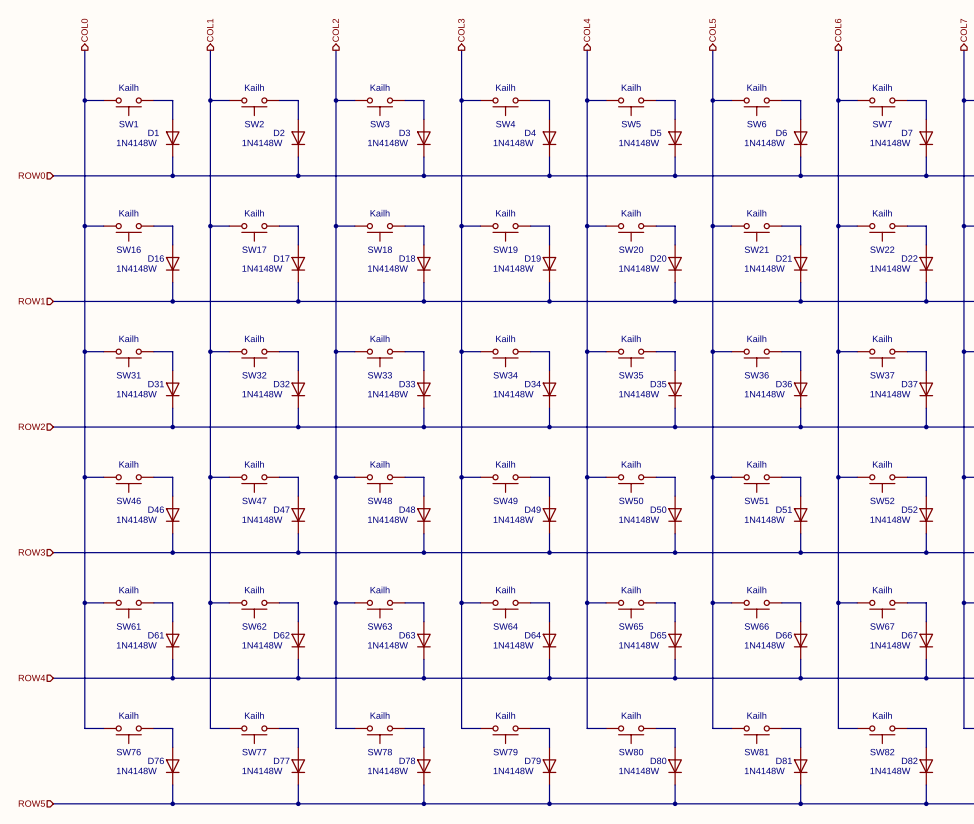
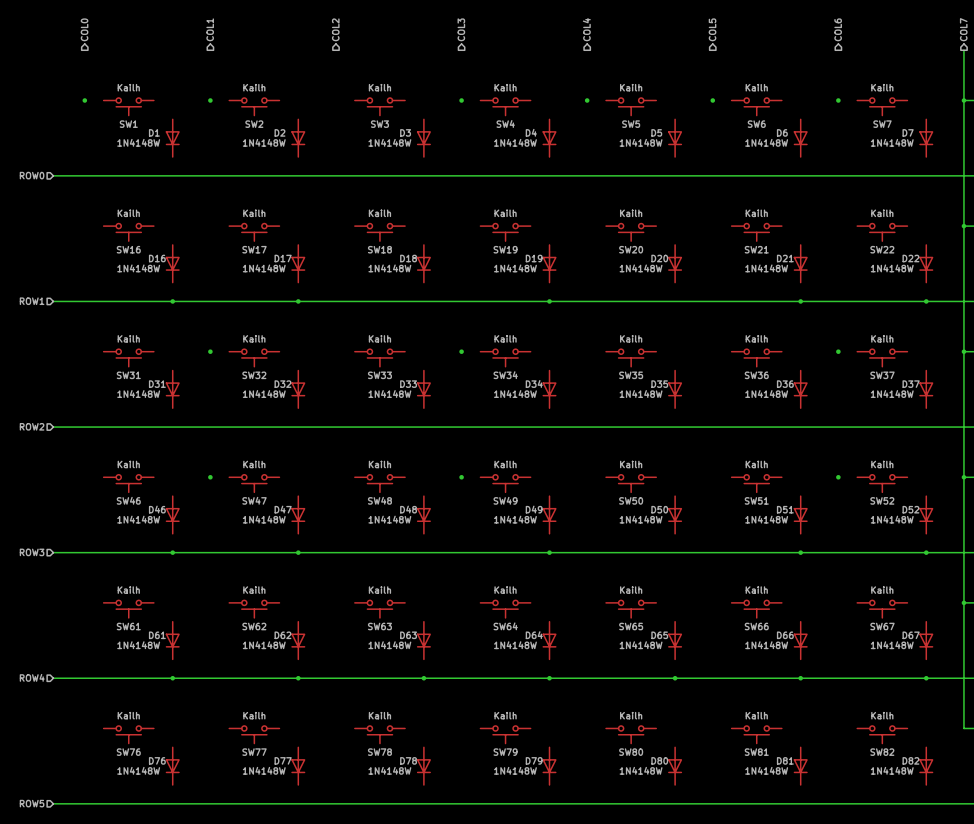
wire: (84, 50) (84, 728) (103, 728) -> none
wire: (210, 50) (210, 728) (229, 728) -> none
wire: (335, 50) (335, 728) (354, 728) -> none
wire: (461, 50) (461, 728) (480, 728) -> none
wire: (587, 50) (587, 728) (606, 728) -> none
wire: (712, 50) (712, 728) (731, 728) -> none
wire: (838, 50) (838, 728) (857, 728) -> none
wire: (84, 100) (103, 100) -> none
wire: (153, 100) (172, 100) (172, 119) -> none
wire: (210, 100) (229, 100) -> none
wire: (279, 100) (298, 100) (298, 119) -> none
wire: (335, 100) (354, 100) -> none
junction: (335, 100) -> none
wire: (405, 100) (423, 100) (423, 119) -> none
wire: (461, 100) (480, 100) -> none
wire: (530, 100) (549, 100) (549, 119) -> none
wire: (587, 100) (606, 100) -> none
wire: (656, 100) (675, 100) (675, 119) -> none
wire: (712, 100) (731, 100) -> none
wire: (781, 100) (800, 100) (800, 119) -> none
wire: (838, 100) (857, 100) -> none
wire: (907, 100) (926, 100) (926, 119) -> none
wire: (172, 157) (172, 175) -> none
wire: (298, 157) (298, 175) -> none
wire: (423, 157) (423, 175) -> none
wire: (549, 157) (549, 175) -> none
wire: (675, 157) (675, 175) -> none
wire: (800, 157) (800, 175) -> none
wire: (926, 157) (926, 175) -> none
junction: (172, 175) -> none
junction: (298, 175) -> none
junction: (423, 175) -> none
junction: (549, 175) -> none
junction: (675, 175) -> none
junction: (800, 175) -> none
junction: (926, 175) -> none
wire: (84, 226) (103, 226) -> none
junction: (84, 226) -> none
wire: (153, 226) (172, 226) (172, 244) -> none
wire: (210, 226) (229, 226) -> none
junction: (210, 226) -> none
wire: (279, 226) (298, 226) (298, 244) -> none
wire: (335, 226) (354, 226) -> none
junction: (335, 226) -> none
wire: (405, 226) (423, 226) (423, 244) -> none
wire: (461, 226) (480, 226) -> none
junction: (461, 226) -> none
wire: (530, 226) (549, 226) (549, 244) -> none
wire: (587, 226) (606, 226) -> none
junction: (587, 226) -> none
wire: (656, 226) (675, 226) (675, 244) -> none
wire: (712, 226) (731, 226) -> none
junction: (712, 226) -> none
wire: (781, 226) (800, 226) (800, 244) -> none
wire: (838, 226) (857, 226) -> none
junction: (838, 226) -> none
wire: (907, 226) (926, 226) (926, 244) -> none
wire: (172, 282) (172, 301) -> none
wire: (298, 282) (298, 301) -> none
wire: (423, 282) (423, 301) -> none
wire: (549, 282) (549, 301) -> none
wire: (675, 282) (675, 301) -> none
wire: (800, 282) (800, 301) -> none
wire: (926, 282) (926, 301) -> none
junction: (423, 301) -> none
junction: (675, 301) -> none
wire: (84, 351) (103, 351) -> none
junction: (84, 351) -> none
wire: (153, 351) (172, 351) (172, 370) -> none
wire: (210, 351) (229, 351) -> none
wire: (279, 351) (298, 351) (298, 370) -> none
wire: (335, 351) (354, 351) -> none
junction: (335, 351) -> none
wire: (405, 351) (423, 351) (423, 370) -> none
wire: (461, 351) (480, 351) -> none
wire: (530, 351) (549, 351) (549, 370) -> none
wire: (587, 351) (606, 351) -> none
junction: (587, 351) -> none
wire: (656, 351) (675, 351) (675, 370) -> none
wire: (712, 351) (731, 351) -> none
junction: (712, 351) -> none
wire: (781, 351) (800, 351) (800, 370) -> none
wire: (838, 351) (857, 351) -> none
wire: (907, 351) (926, 351) (926, 370) -> none
wire: (172, 408) (172, 427) -> none
wire: (298, 408) (298, 427) -> none
wire: (423, 408) (423, 427) -> none
wire: (549, 408) (549, 427) -> none
wire: (675, 408) (675, 427) -> none
wire: (800, 408) (800, 427) -> none
wire: (926, 408) (926, 427) -> none
junction: (172, 427) -> none
junction: (298, 427) -> none
junction: (423, 427) -> none
junction: (549, 427) -> none
junction: (675, 427) -> none
junction: (800, 427) -> none
junction: (926, 427) -> none
wire: (84, 477) (103, 477) -> none
junction: (84, 477) -> none
wire: (153, 477) (172, 477) (172, 496) -> none
wire: (210, 477) (229, 477) -> none
wire: (279, 477) (298, 477) (298, 496) -> none
wire: (335, 477) (354, 477) -> none
junction: (335, 477) -> none
wire: (405, 477) (423, 477) (423, 496) -> none
wire: (461, 477) (480, 477) -> none
wire: (530, 477) (549, 477) (549, 496) -> none
wire: (587, 477) (606, 477) -> none
junction: (587, 477) -> none
wire: (656, 477) (675, 477) (675, 496) -> none
wire: (712, 477) (731, 477) -> none
junction: (712, 477) -> none
wire: (781, 477) (800, 477) (800, 496) -> none
wire: (838, 477) (857, 477) -> none
wire: (907, 477) (926, 477) (926, 496) -> none
wire: (172, 533) (172, 552) -> none
wire: (298, 533) (298, 552) -> none
wire: (423, 533) (423, 552) -> none
wire: (549, 533) (549, 552) -> none
wire: (675, 533) (675, 552) -> none
wire: (800, 533) (800, 552) -> none
wire: (926, 533) (926, 552) -> none
junction: (423, 552) -> none
junction: (675, 552) -> none
wire: (84, 602) (103, 602) -> none
junction: (84, 602) -> none
wire: (153, 602) (172, 602) (172, 621) -> none
wire: (210, 602) (229, 602) -> none
junction: (210, 602) -> none
wire: (279, 602) (298, 602) (298, 621) -> none
wire: (335, 602) (354, 602) -> none
junction: (335, 602) -> none
wire: (405, 602) (423, 602) (423, 621) -> none
wire: (461, 602) (480, 602) -> none
junction: (461, 602) -> none
wire: (530, 602) (549, 602) (549, 621) -> none
wire: (587, 602) (606, 602) -> none
junction: (587, 602) -> none
wire: (656, 602) (675, 602) (675, 621) -> none
wire: (712, 602) (731, 602) -> none
junction: (712, 602) -> none
wire: (781, 602) (800, 602) (800, 621) -> none
wire: (838, 602) (857, 602) -> none
junction: (838, 602) -> none
wire: (907, 602) (926, 602) (926, 621) -> none
wire: (172, 659) (172, 678) -> none
wire: (298, 659) (298, 678) -> none
wire: (423, 659) (423, 678) -> none
wire: (549, 659) (549, 678) -> none
wire: (675, 659) (675, 678) -> none
wire: (800, 659) (800, 678) -> none
wire: (926, 659) (926, 678) -> none
wire: (153, 728) (172, 728) (172, 747) -> none
wire: (279, 728) (298, 728) (298, 747) -> none
wire: (405, 728) (423, 728) (423, 747) -> none
wire: (530, 728) (549, 728) (549, 747) -> none
wire: (656, 728) (675, 728) (675, 747) -> none
wire: (781, 728) (800, 728) (800, 747) -> none
wire: (907, 728) (926, 728) (926, 747) -> none
wire: (172, 784) (172, 803) -> none
wire: (298, 784) (298, 803) -> none
wire: (423, 784) (423, 803) -> none
wire: (549, 784) (549, 803) -> none
wire: (675, 784) (675, 803) -> none
wire: (800, 784) (800, 803) -> none
wire: (926, 784) (926, 803) -> none
junction: (172, 803) -> none
junction: (298, 803) -> none
junction: (423, 803) -> none
junction: (549, 803) -> none
junction: (675, 803) -> none
junction: (800, 803) -> none
junction: (926, 803) -> none

